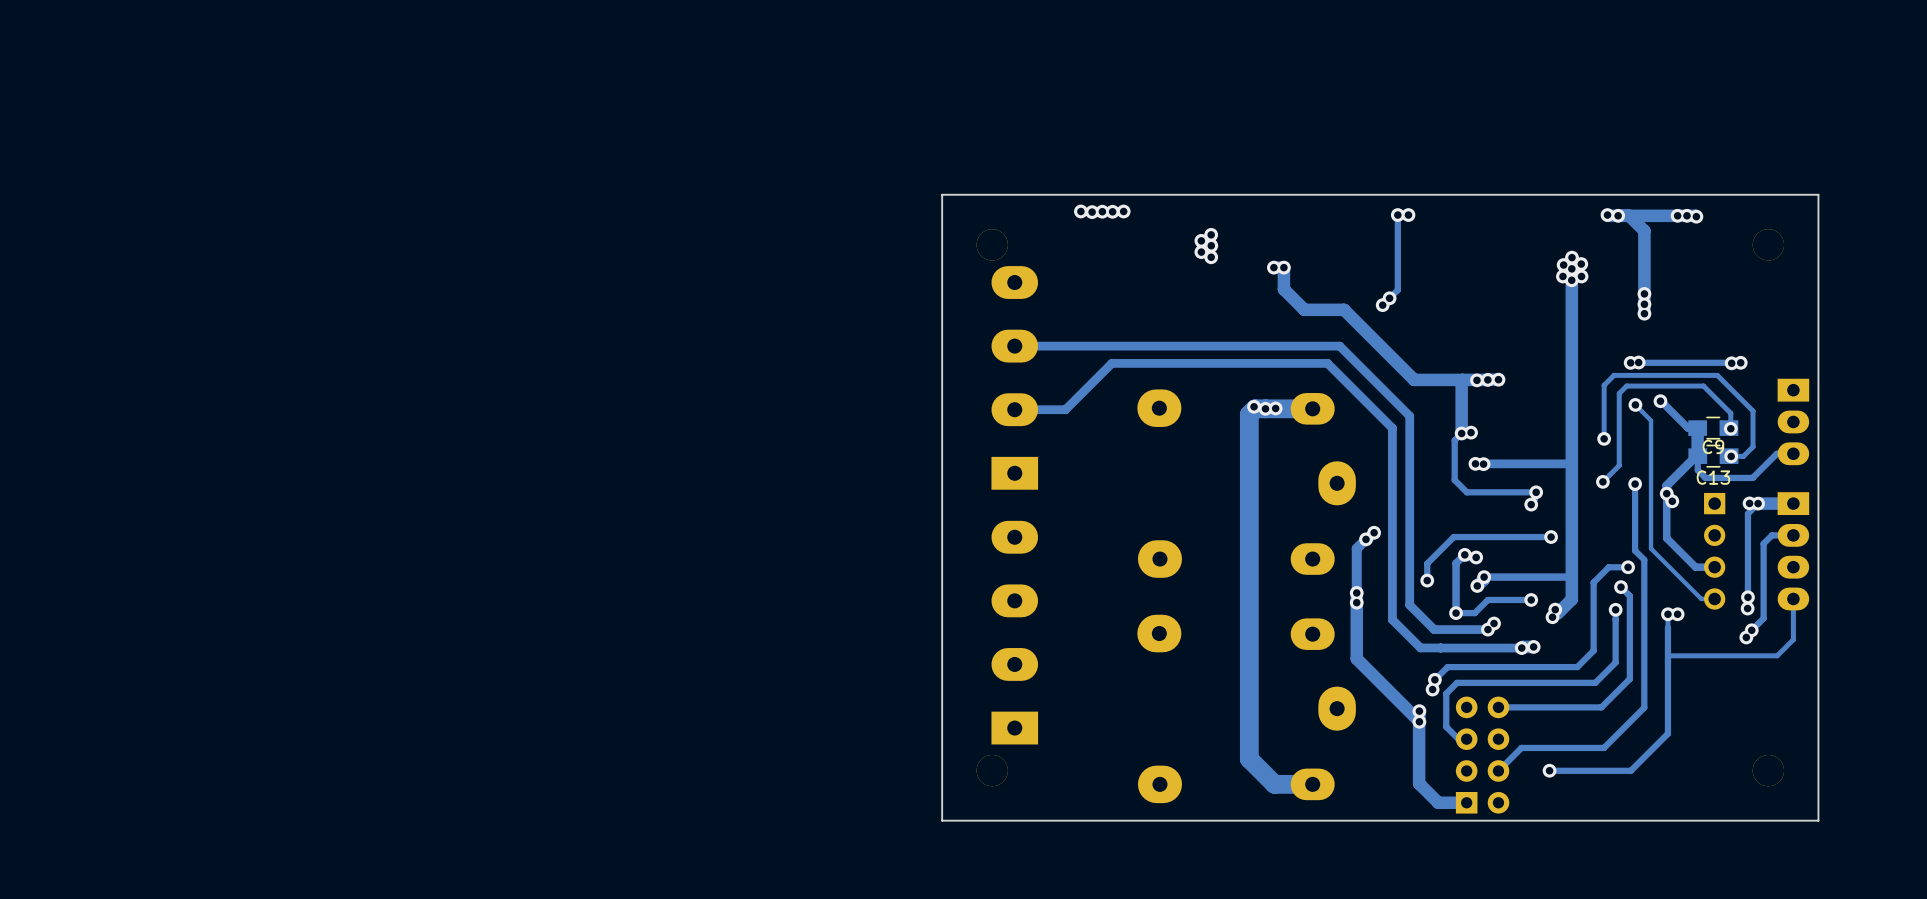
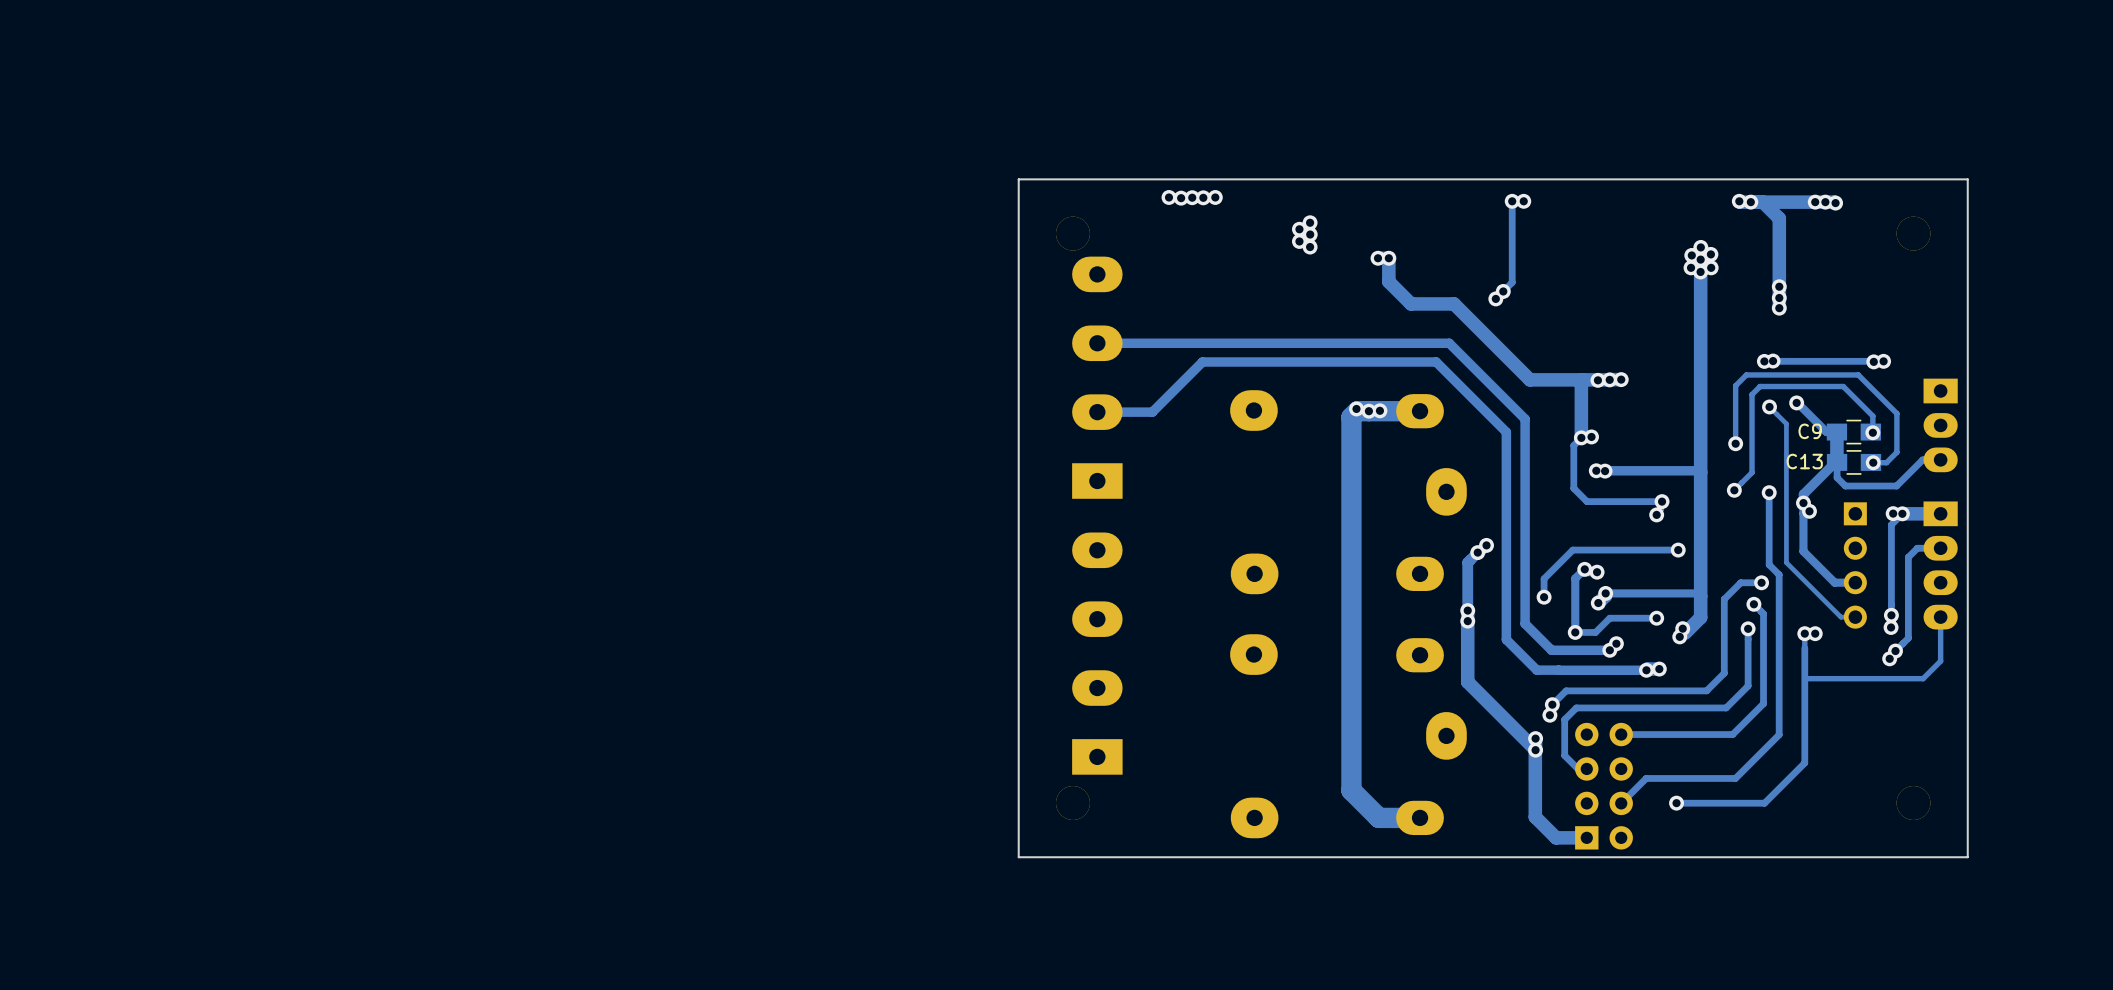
C9 name position: C9 (1713, 446) -> C9 (1810, 431)
C13 name position: C13 (1713, 477) -> C13 (1804, 461)

